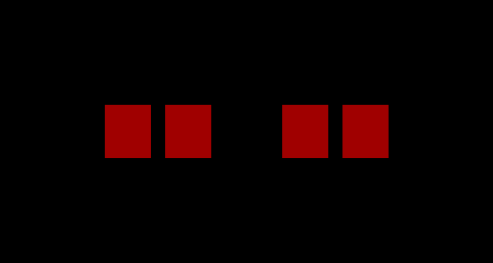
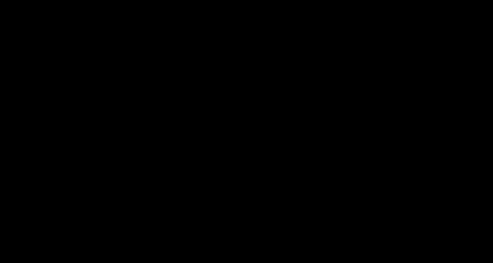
part: (158, 131) -> none
part: (335, 131) -> none

